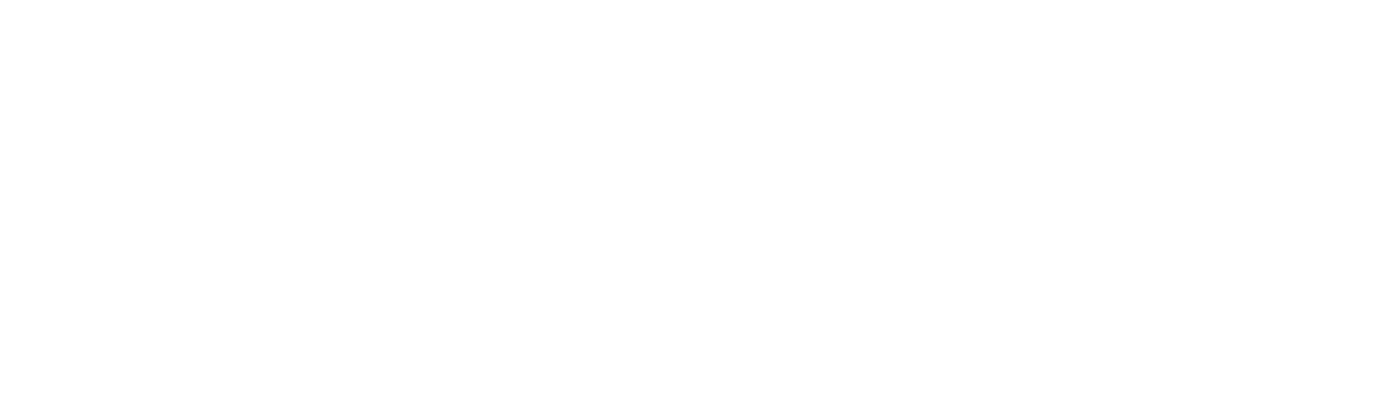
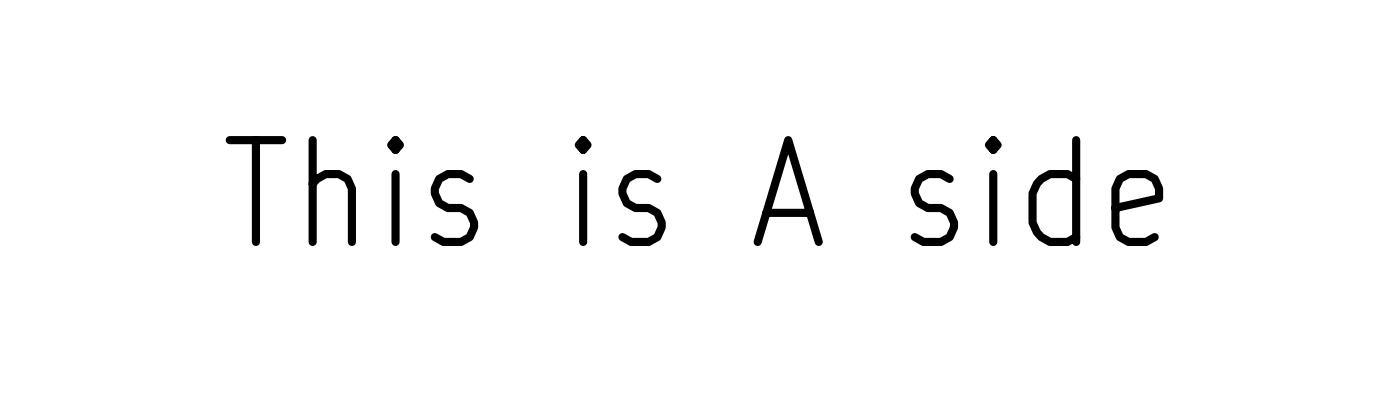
text: none -> This is A side (694, 191)

